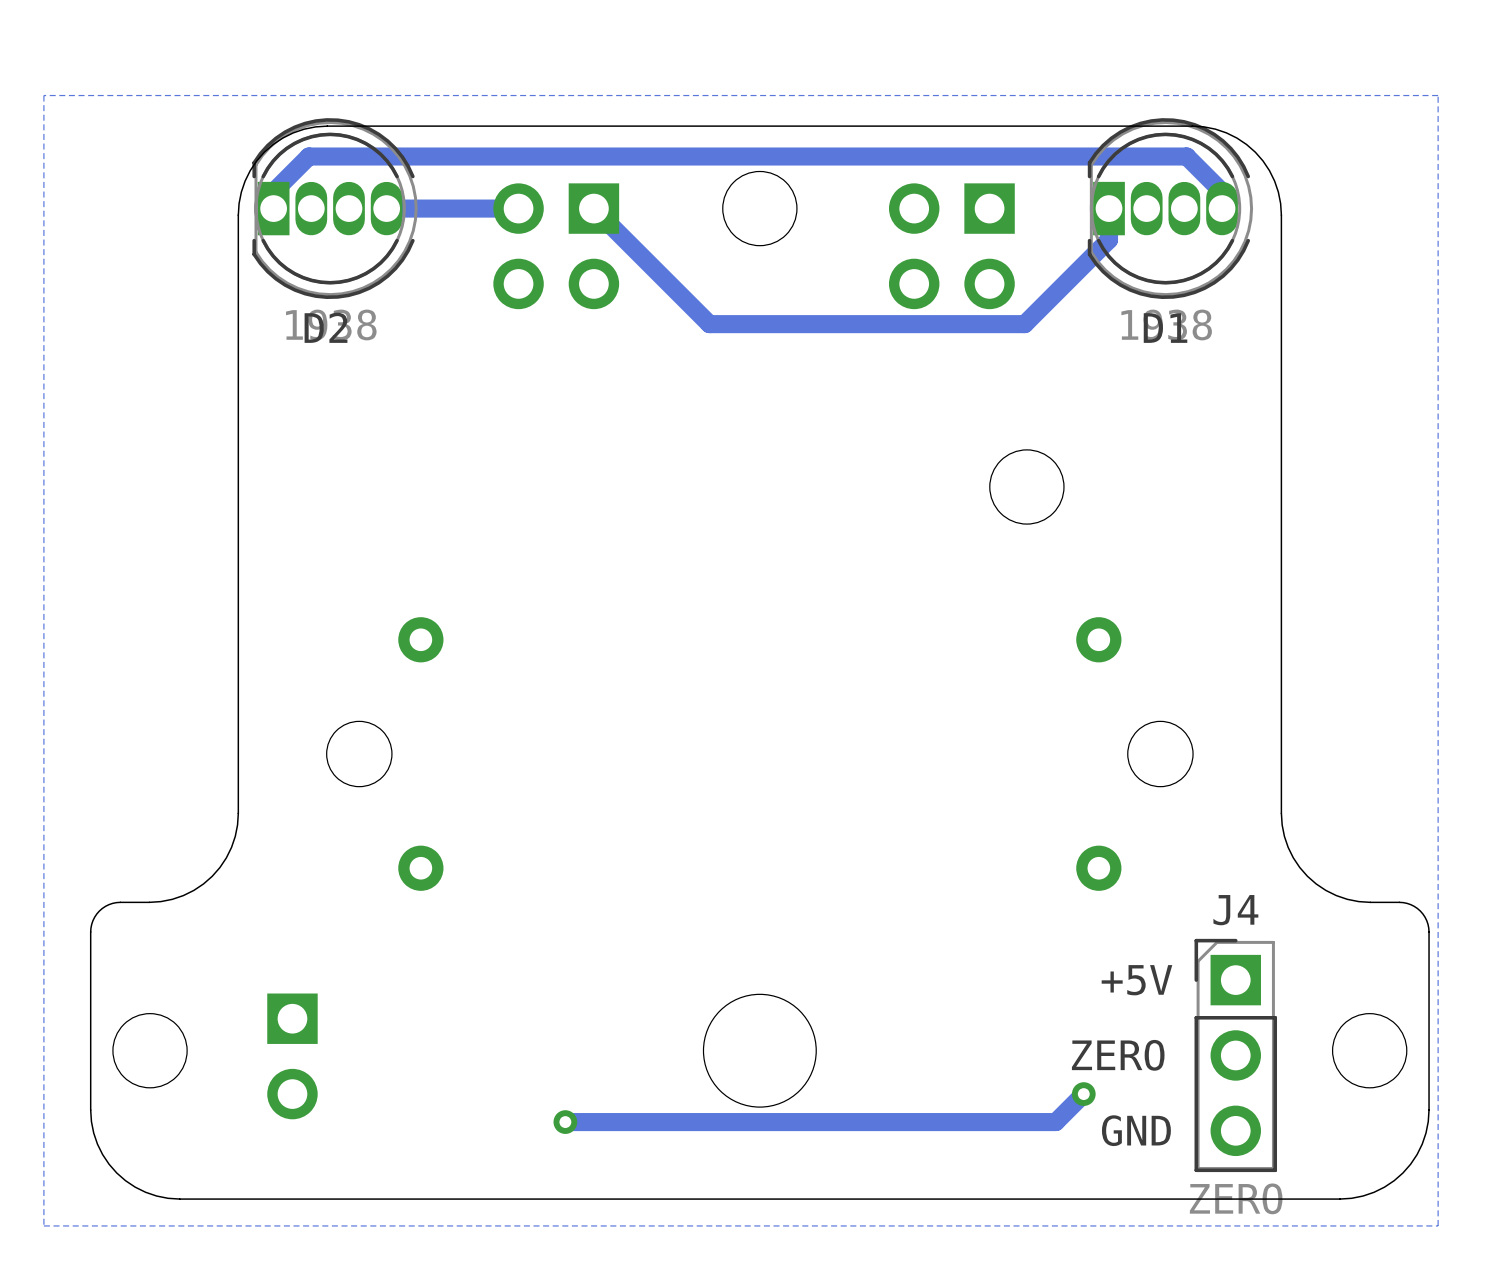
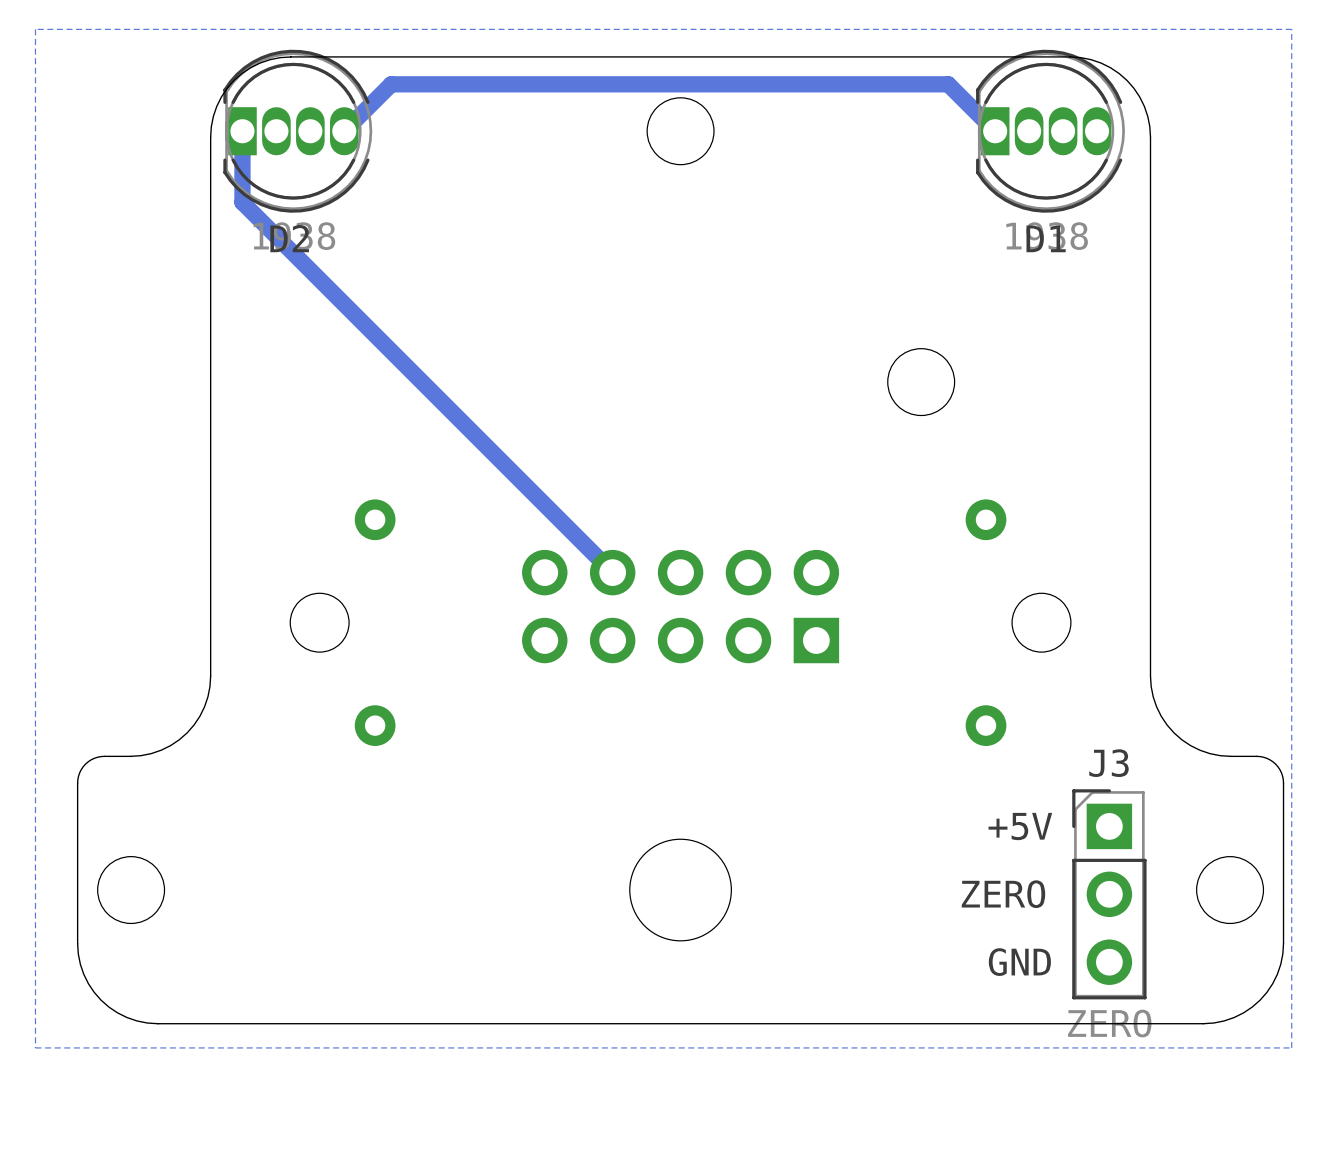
track: (438, 156) (308, 156) (273, 191) (273, 208) -> (612, 572) (242, 202) (242, 131)
track: (1056, 156) (1186, 156) (1222, 191) (1222, 208) -> (948, 84) (995, 131)
track: (518, 208) (386, 208) -> (391, 84) (344, 131)
track: (1109, 208) (1109, 239) (1024, 324) (709, 324) (593, 208) -> none
part: (556, 246) -> none
part: (951, 246) -> none
part: none -> (680, 606)
J4 name: J4 (1235, 910) -> J3 (1108, 763)
part: (292, 1056) -> none
track: (1083, 1094) (1055, 1122) (565, 1122) -> none
via: (1083, 1094) -> none
via: (565, 1122) -> none

